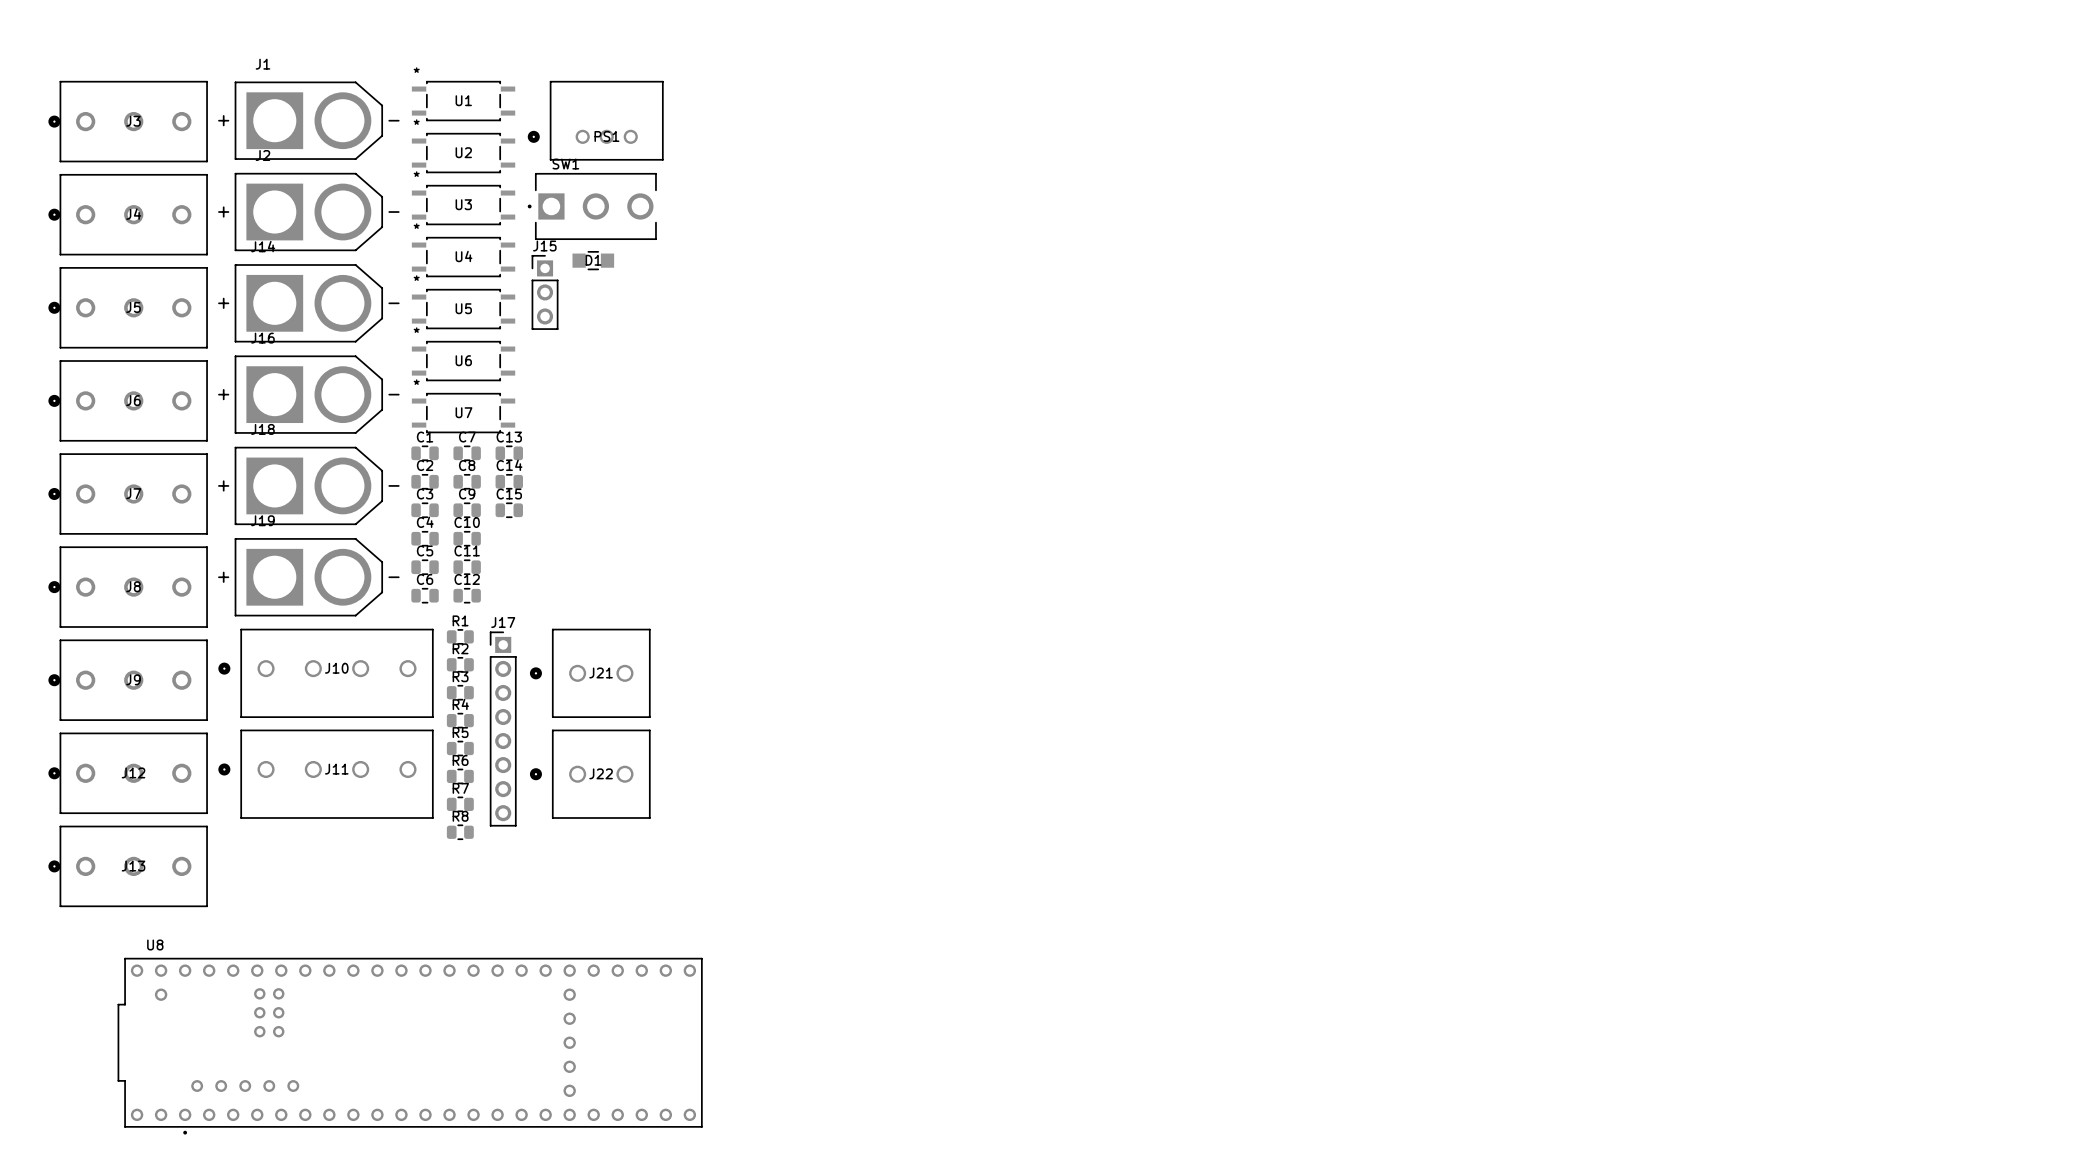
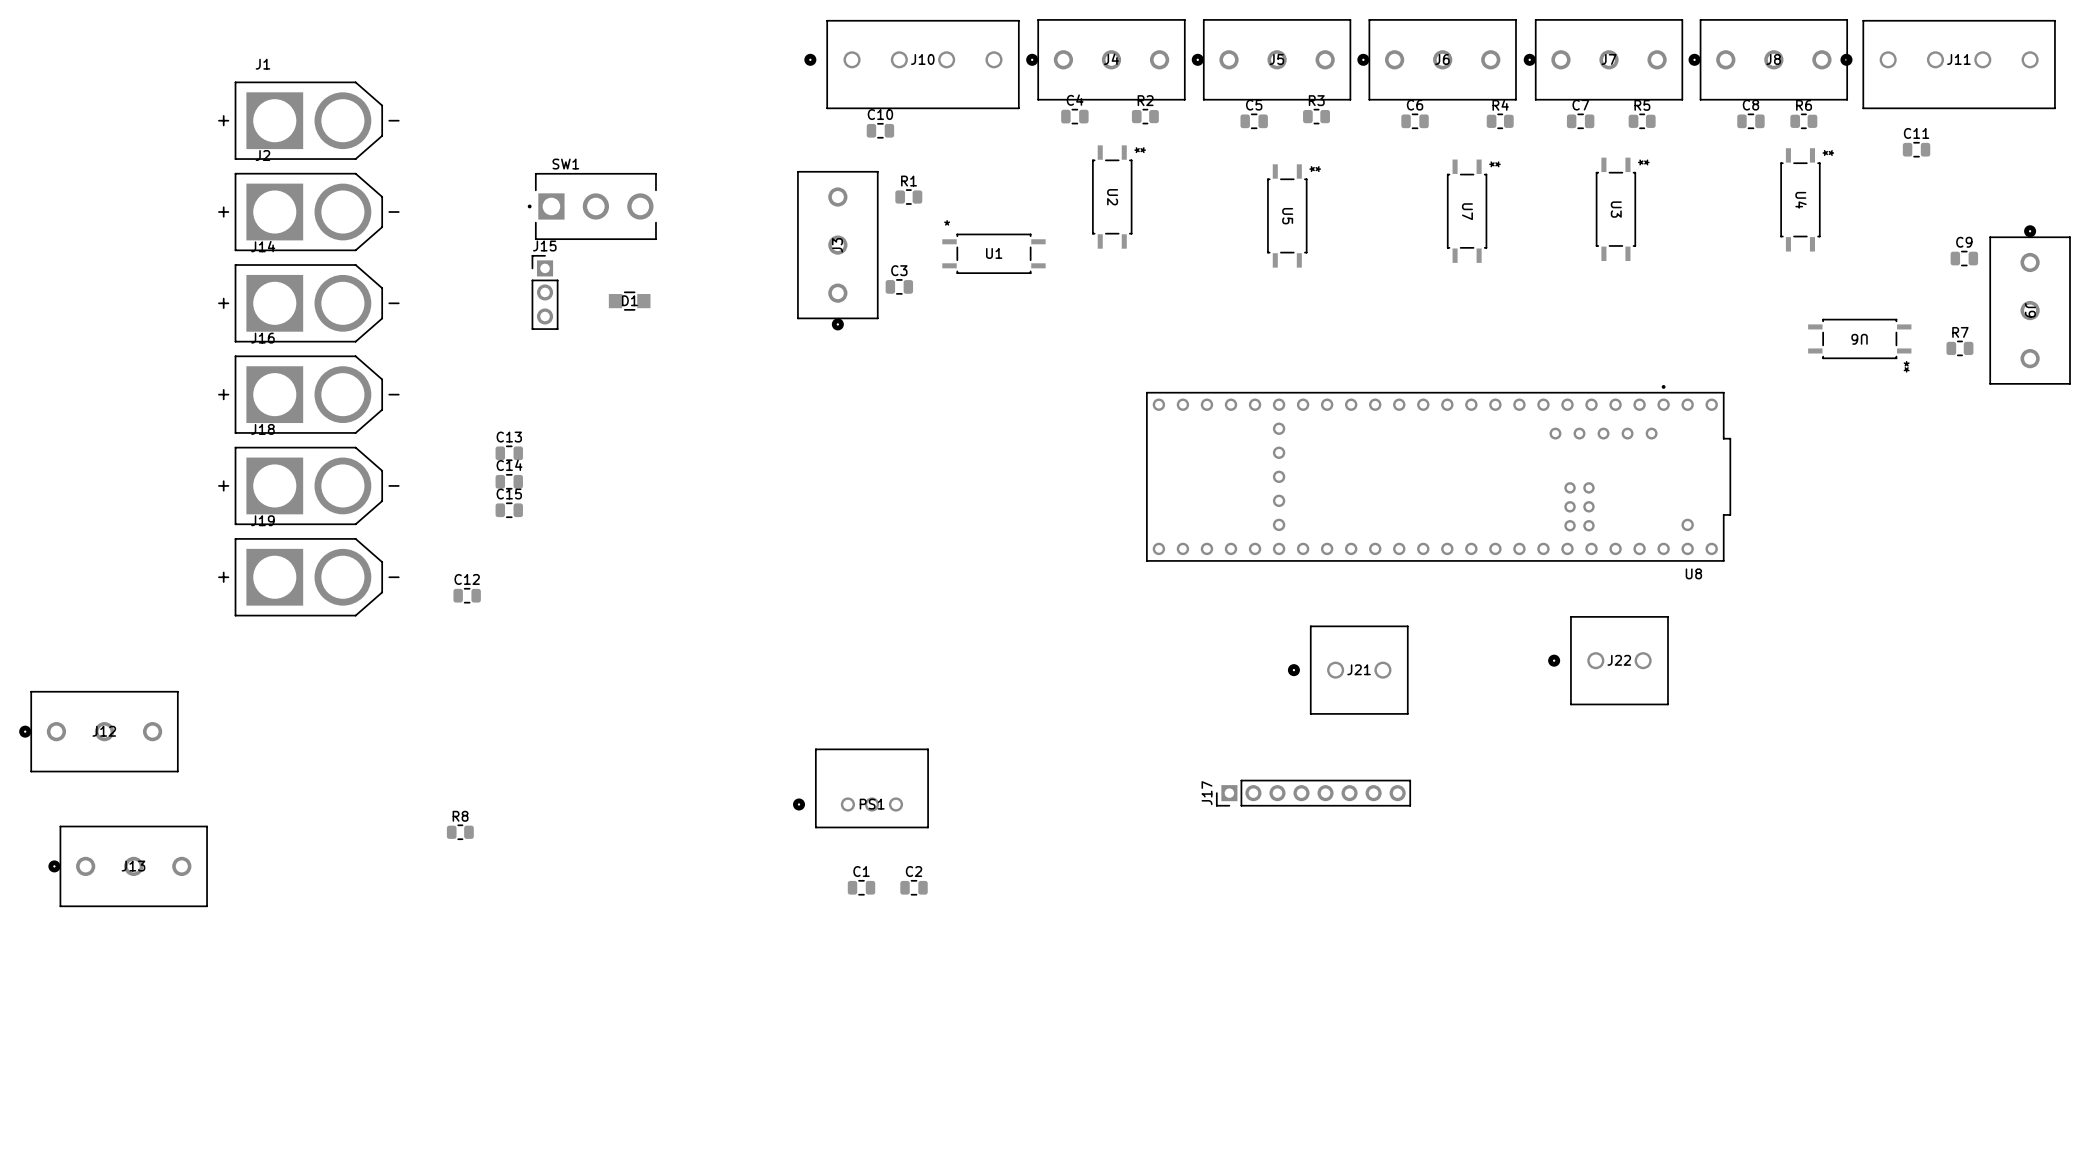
U1 position: (463, 101) -> (993, 253)
PS1 position: (595, 120) -> (860, 788)
J3 rotation: 0° (128, 121) -> 90° counterclockwise (837, 250)
J3 position: (128, 121) -> (837, 250)
U2 rotation: 0° (463, 153) -> 90° clockwise (1112, 197)
U2 position: (463, 153) -> (1112, 197)
U3 rotation: 0° (463, 205) -> 90° clockwise (1615, 209)
U3 position: (463, 205) -> (1615, 209)
J4 position: (128, 214) -> (1105, 59)
U4 rotation: 0° (463, 257) -> 90° clockwise (1800, 199)
U4 position: (463, 257) -> (1800, 199)
D1 position: (593, 260) -> (629, 301)
J5 position: (128, 307) -> (1271, 59)
U5 rotation: 0° (463, 309) -> 90° clockwise (1287, 215)
U5 position: (463, 309) -> (1287, 215)
U6 rotation: 0° (463, 361) -> 180° (1859, 338)
U6 position: (463, 361) -> (1859, 338)
J6 position: (128, 400) -> (1437, 59)
U7 rotation: 0° (463, 413) -> 90° clockwise (1467, 211)
U7 position: (463, 413) -> (1467, 211)
C1 position: (425, 453) -> (861, 887)
C7 position: (467, 453) -> (1580, 121)
C2 position: (425, 481) -> (914, 887)
C8 position: (467, 481) -> (1750, 121)
J7 position: (128, 494) -> (1603, 59)
C3 position: (425, 510) -> (899, 286)
C9 position: (467, 510) -> (1964, 258)
C4 position: (425, 538) -> (1074, 116)
C10 position: (467, 538) -> (880, 130)
C5 position: (425, 567) -> (1254, 121)
C11 position: (467, 567) -> (1916, 149)
J8 position: (128, 587) -> (1768, 59)
C6 position: (425, 595) -> (1415, 121)
R1 position: (460, 636) -> (908, 197)
R2 position: (460, 664) -> (1145, 116)
J10 position: (325, 673) -> (911, 64)
J21 position: (590, 673) -> (1348, 670)
J9 rotation: 0° (128, 680) -> 90° clockwise (2030, 304)
J9 position: (128, 680) -> (2030, 304)
R3 position: (460, 692) -> (1316, 116)
R4 position: (460, 720) -> (1500, 121)
J17 rotation: 0° (503, 729) -> 90° counterclockwise (1313, 793)
J17 position: (503, 729) -> (1313, 793)
R5 position: (460, 748) -> (1642, 121)
J12 position: (128, 773) -> (98, 731)
J11 position: (325, 774) -> (1948, 64)
J22 position: (590, 774) -> (1608, 660)
R6 position: (460, 776) -> (1803, 121)
R7 position: (460, 804) -> (1959, 348)
U8 rotation: 0° (410, 1046) -> 180° (1438, 473)
U8 position: (410, 1046) -> (1438, 473)

